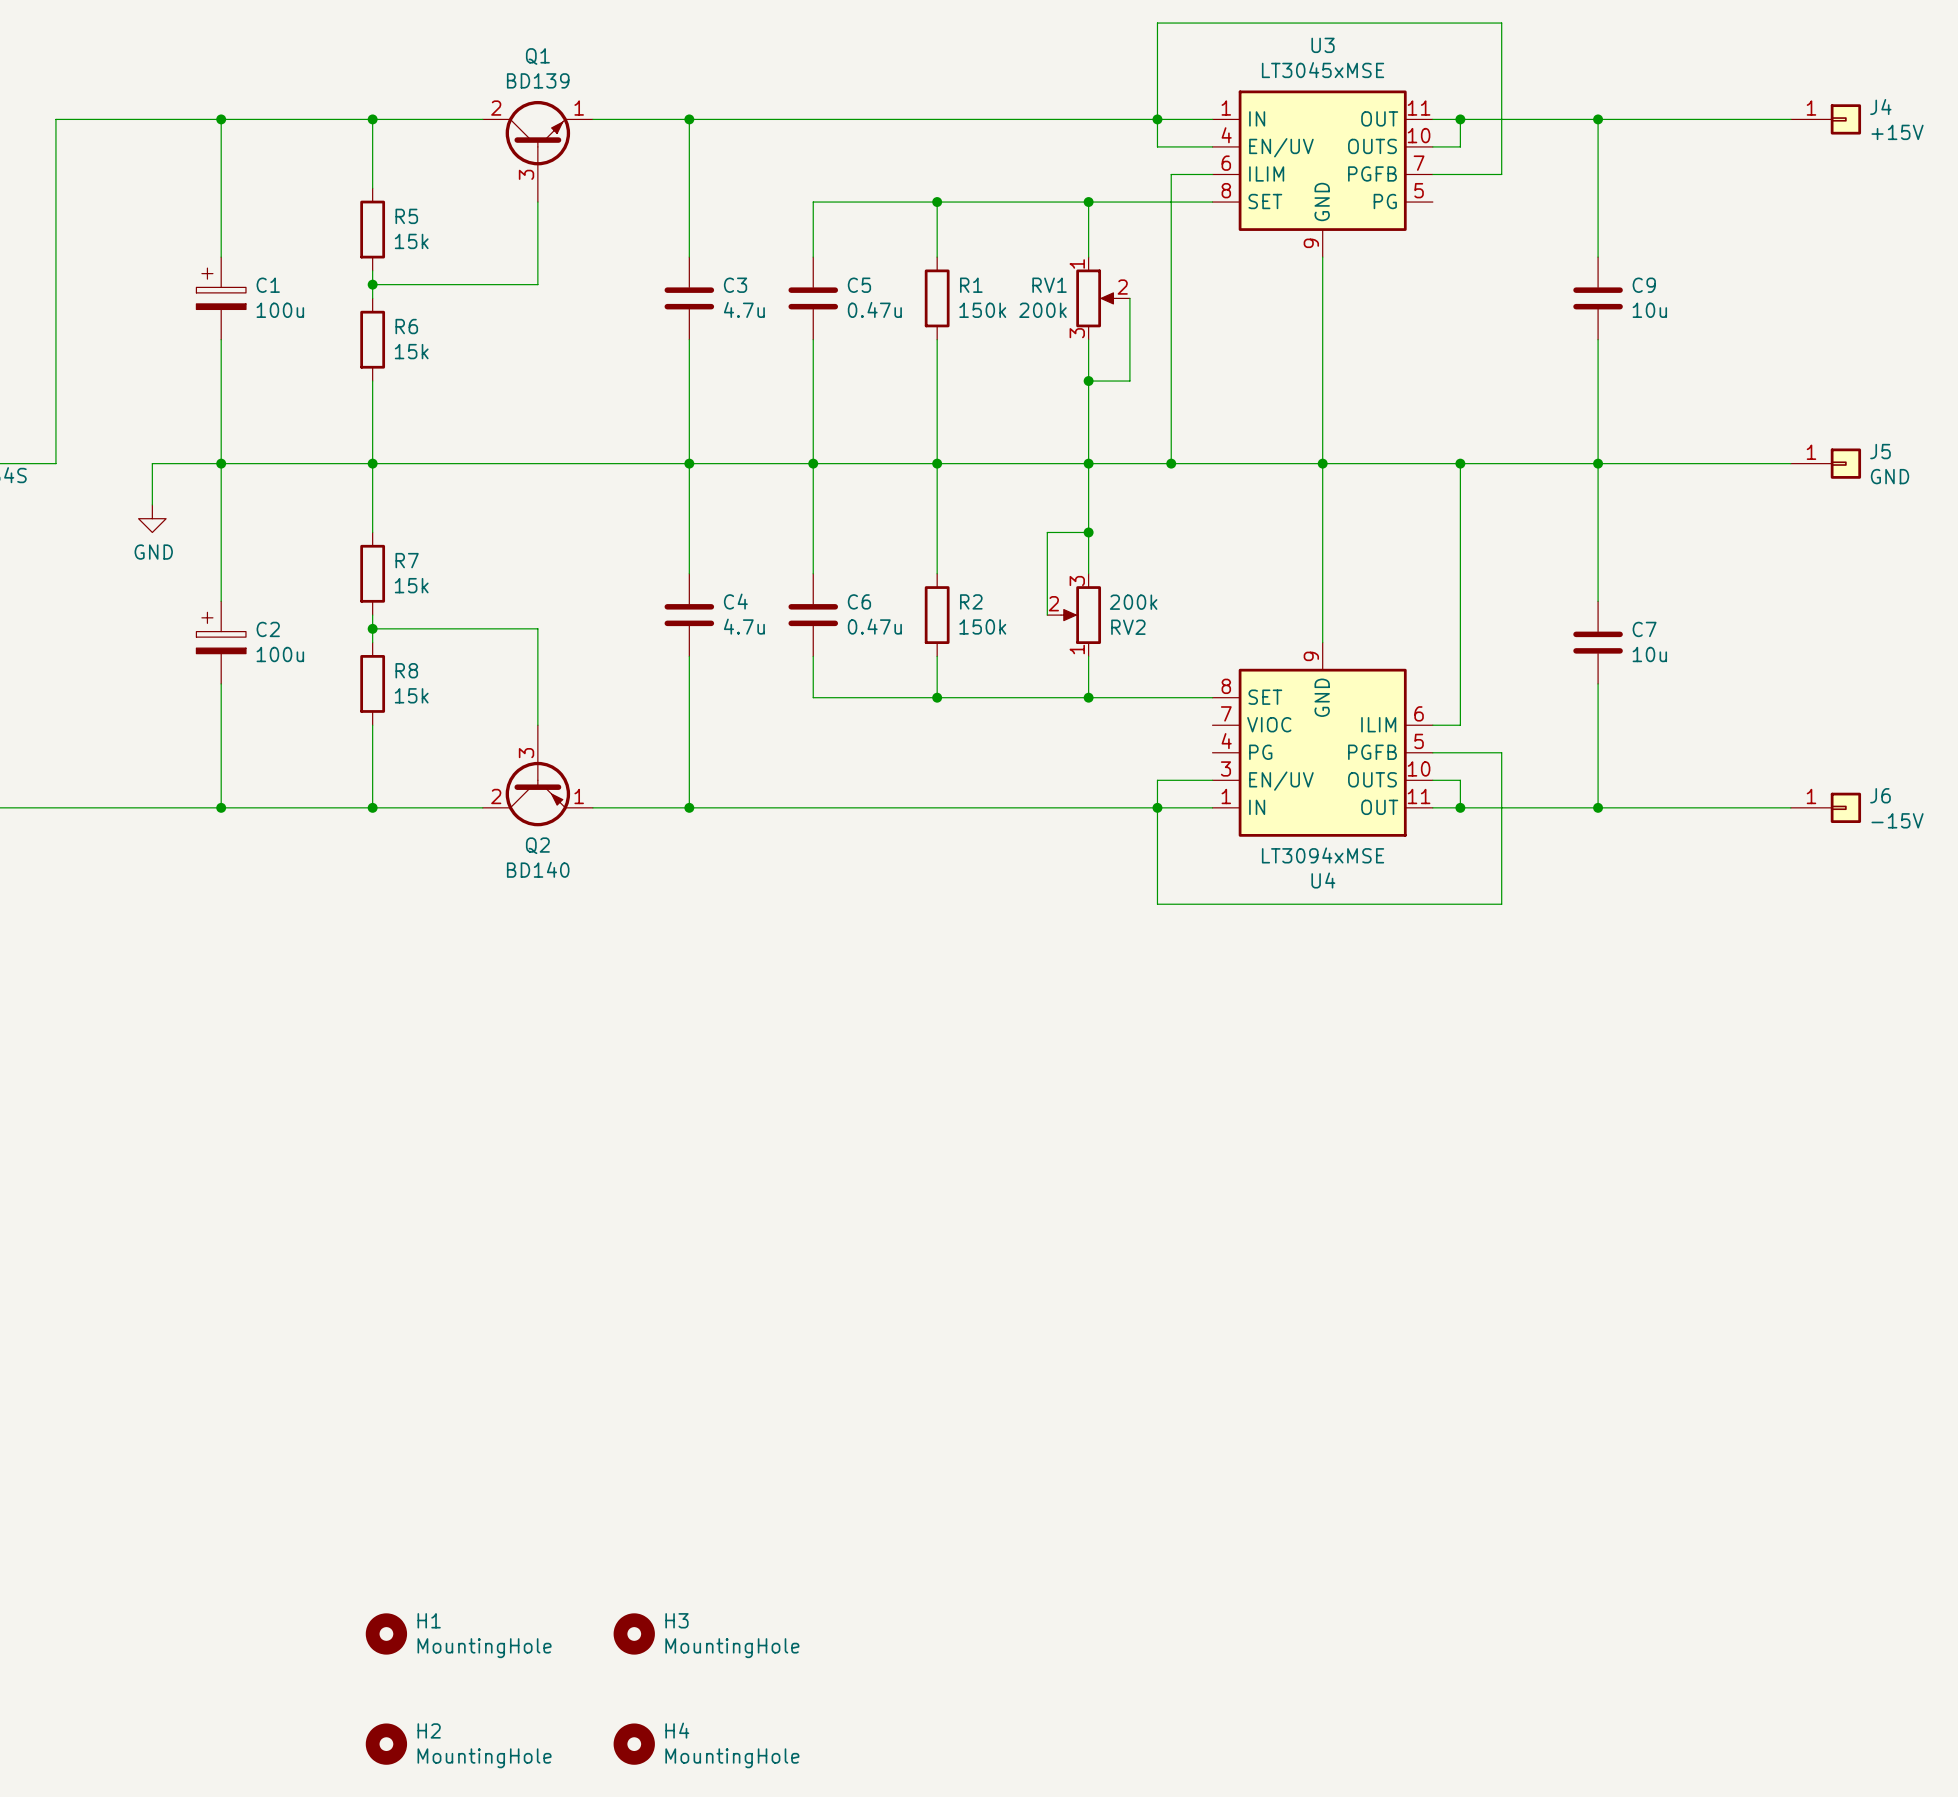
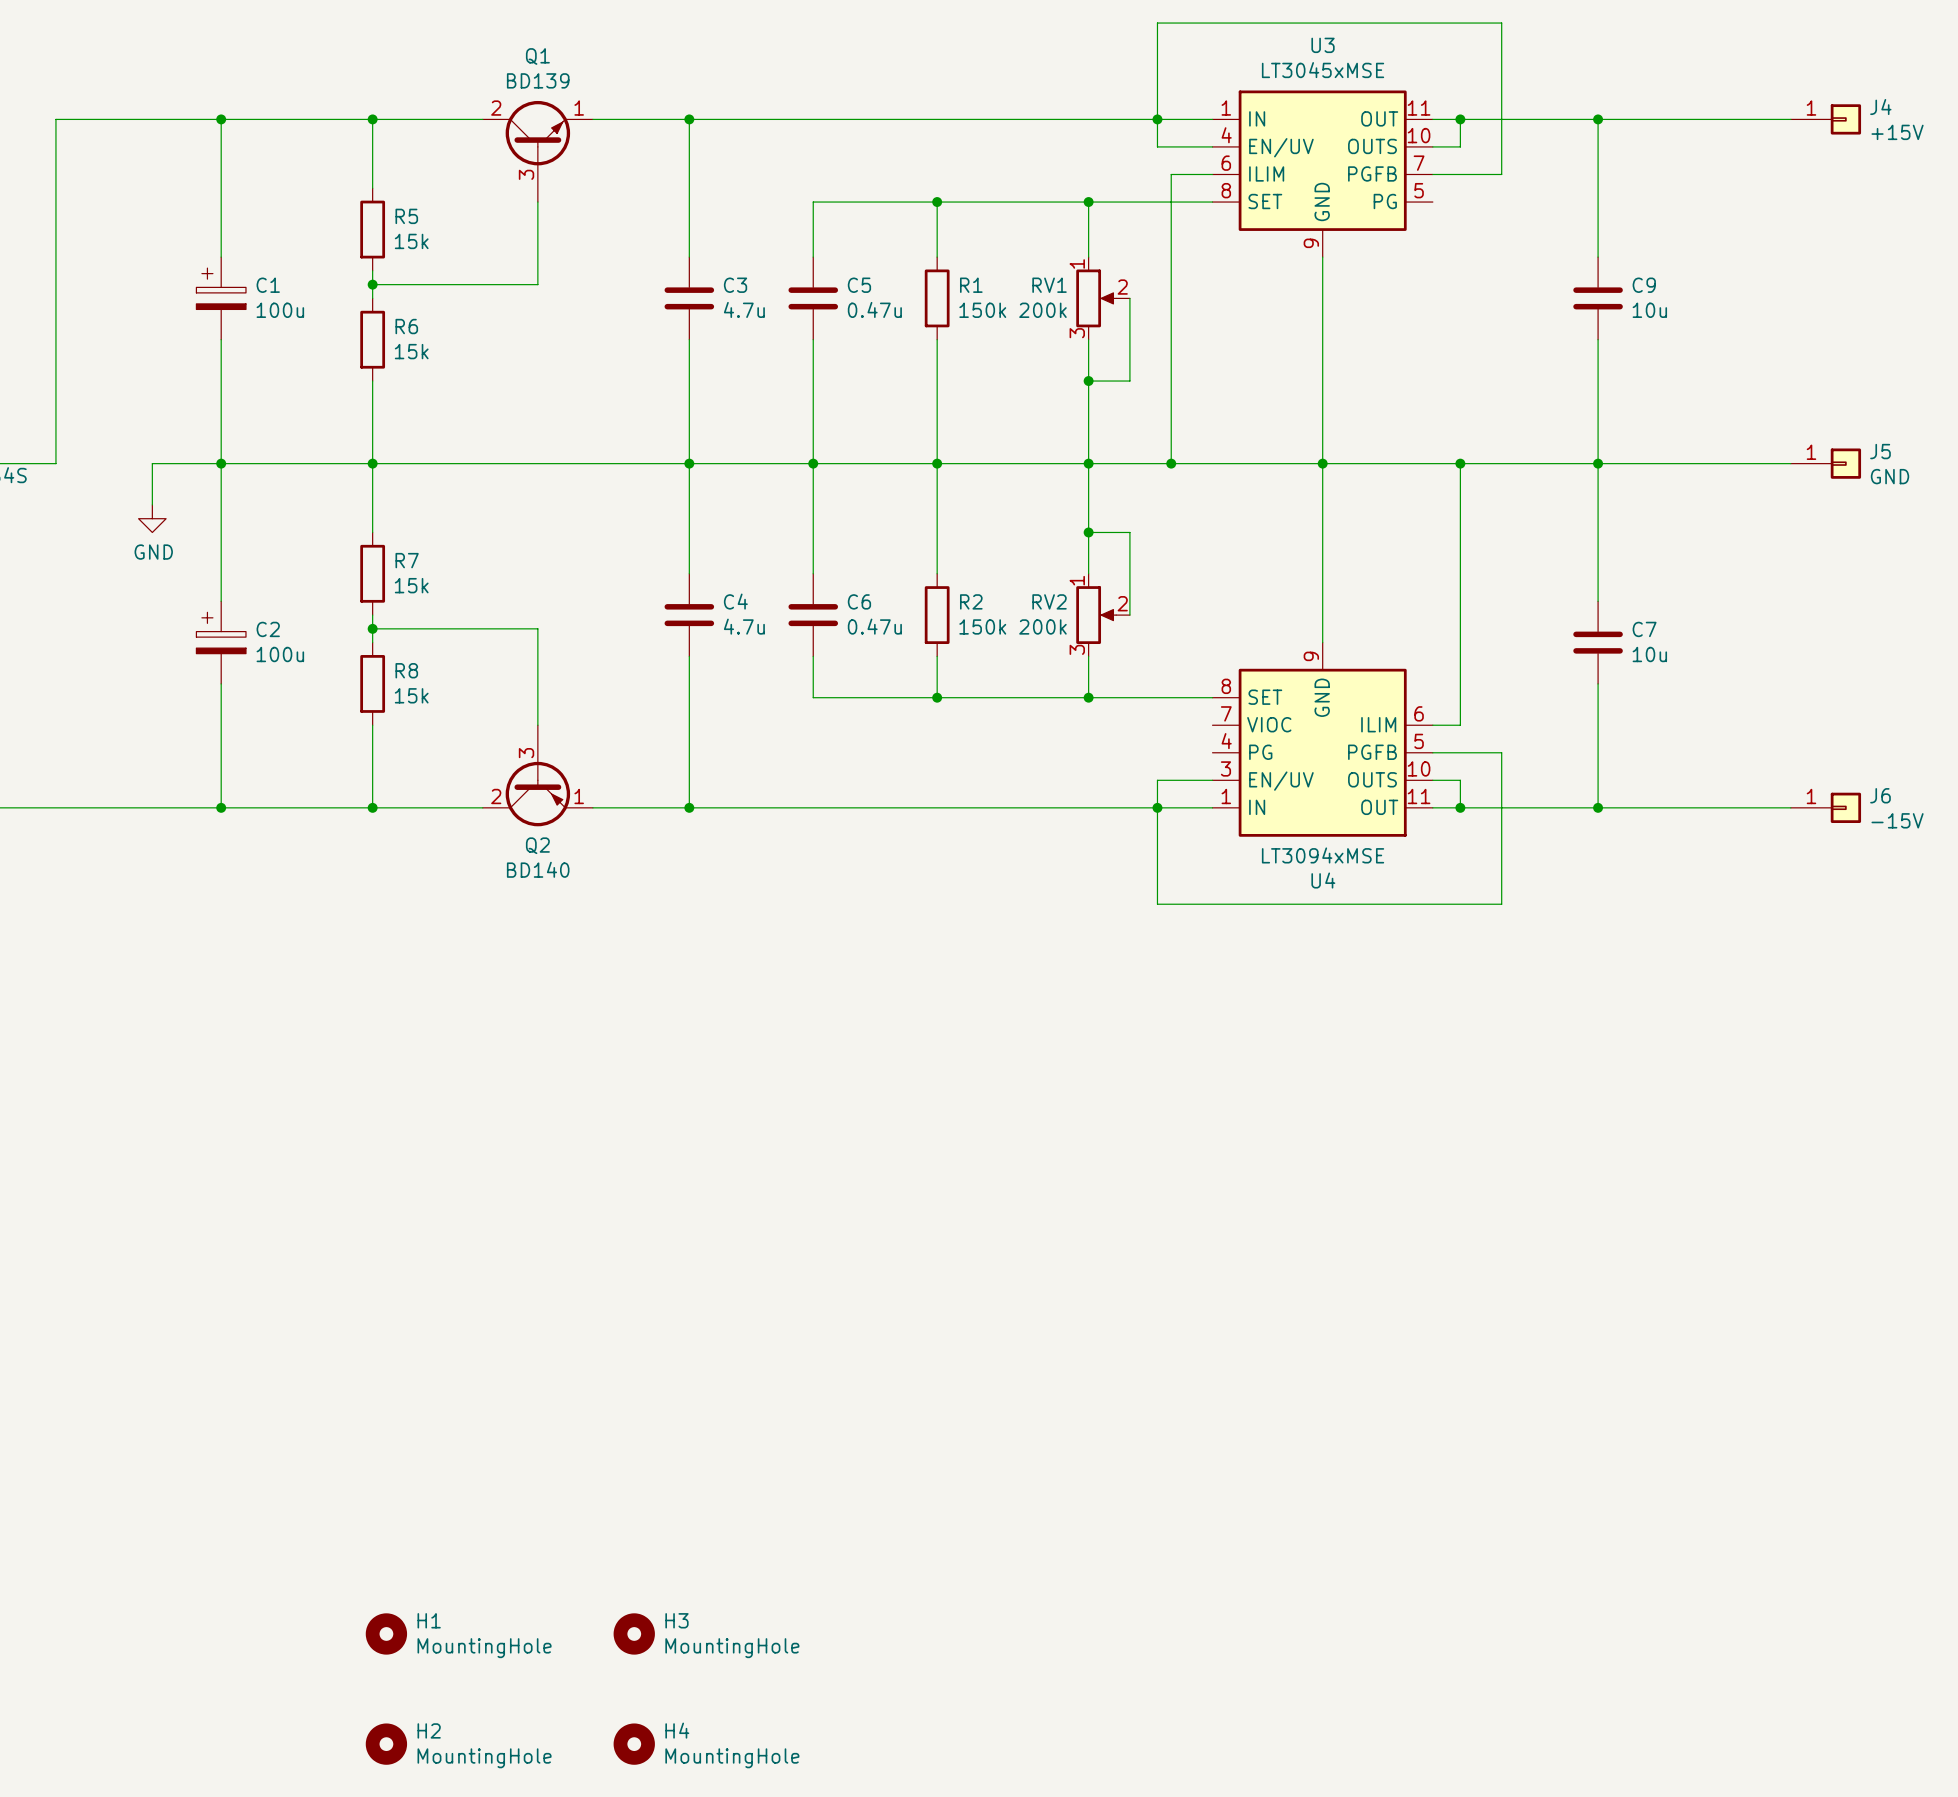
wire: (1088, 532) (1047, 532) (1047, 615) -> (1088, 532) (1129, 532) (1129, 615)
RV2 rotation: 0° (1081, 615) -> 180° (1096, 615)

